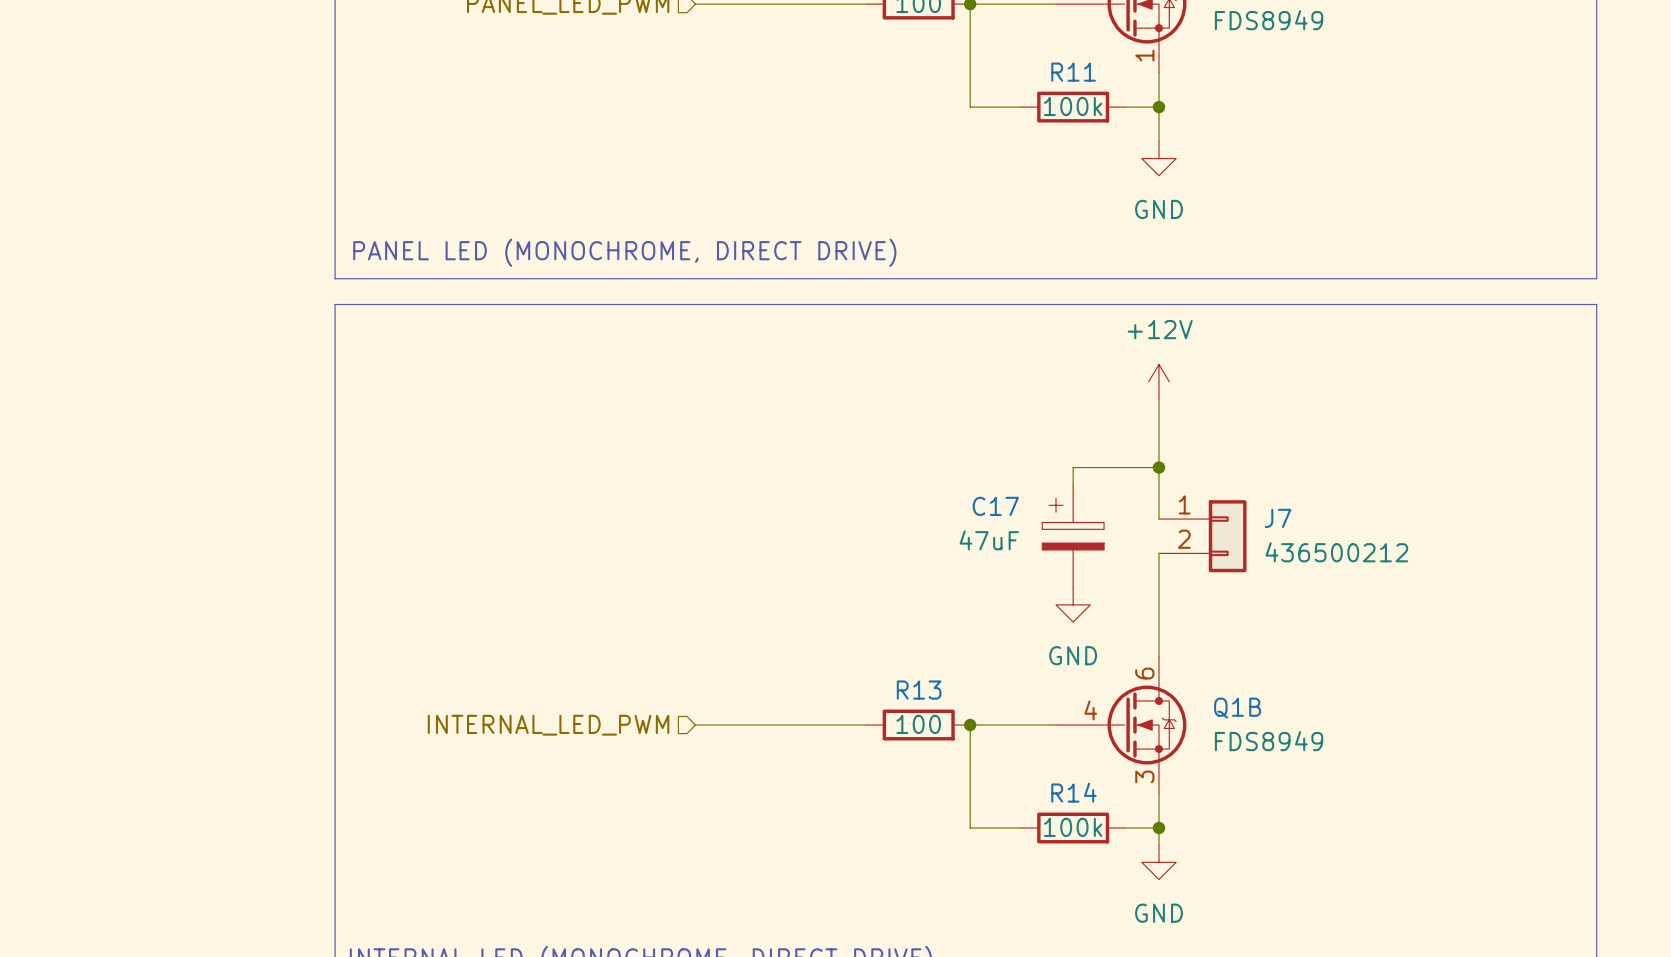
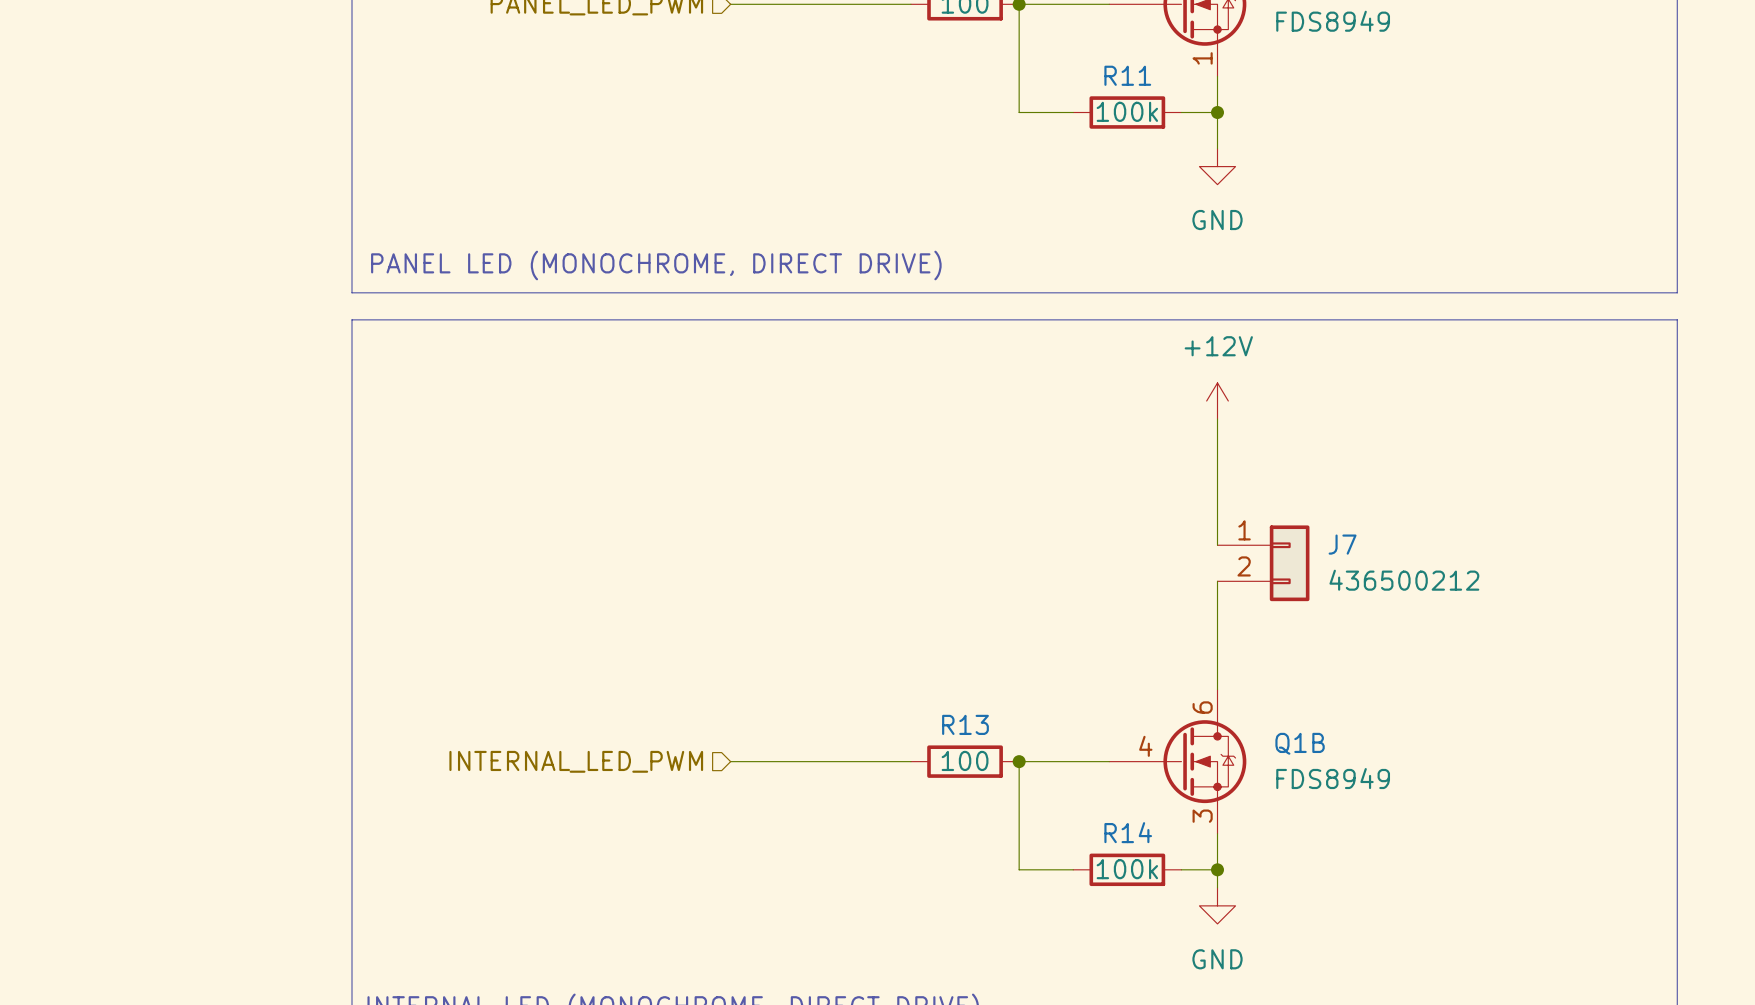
wire: (1158, 467) (1073, 467) (1073, 484) -> none
junction: (1158, 467) -> none
C17: 47uF (1073, 536) -> none
power symbol: GND (1073, 604) -> none

